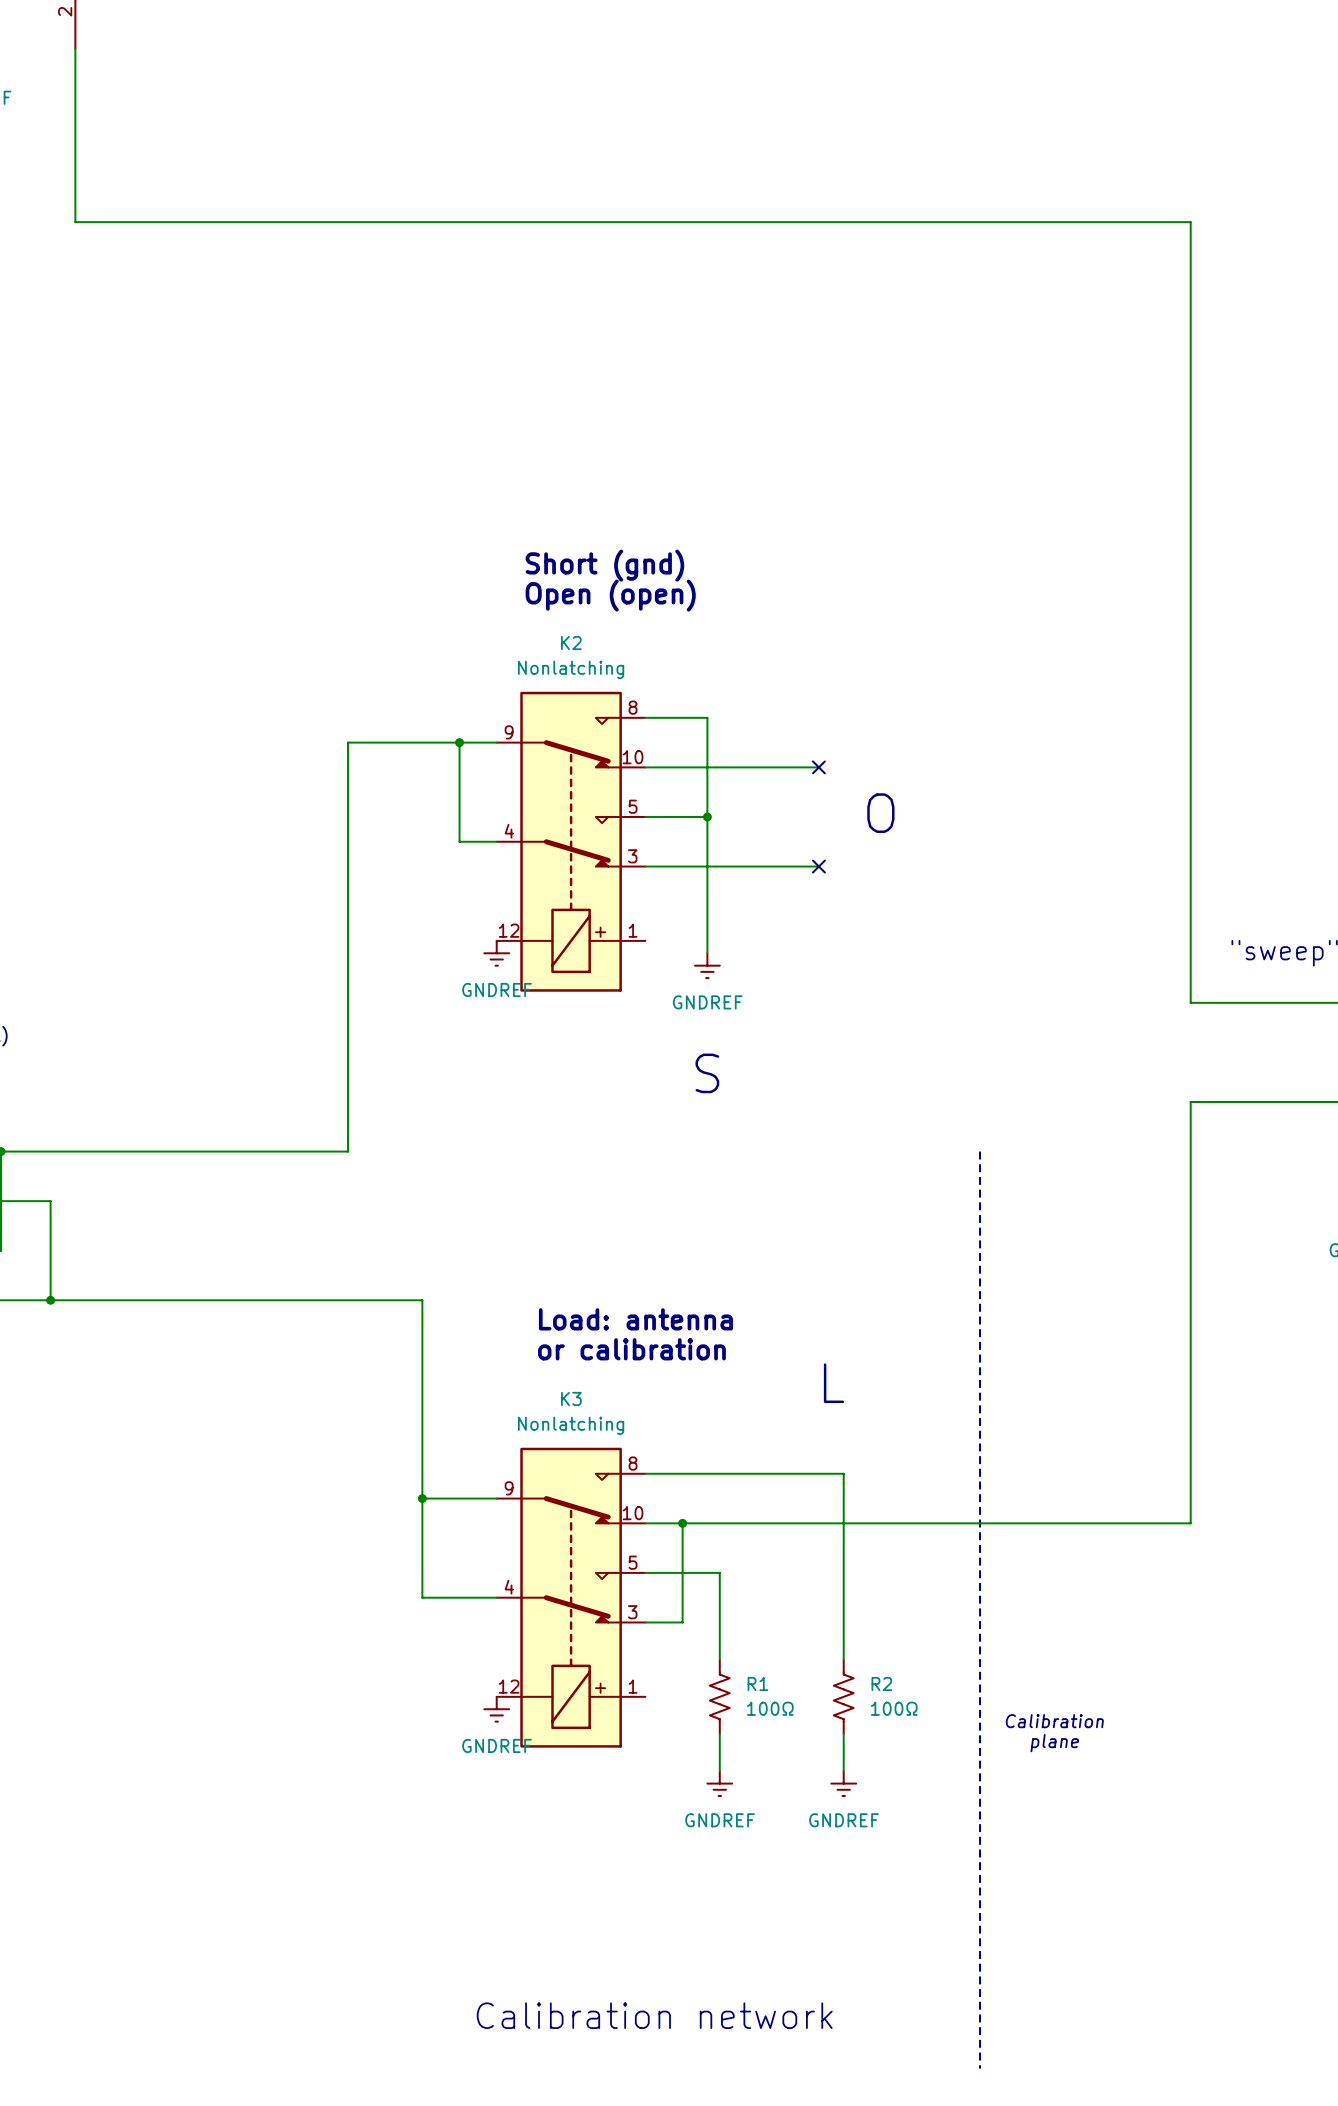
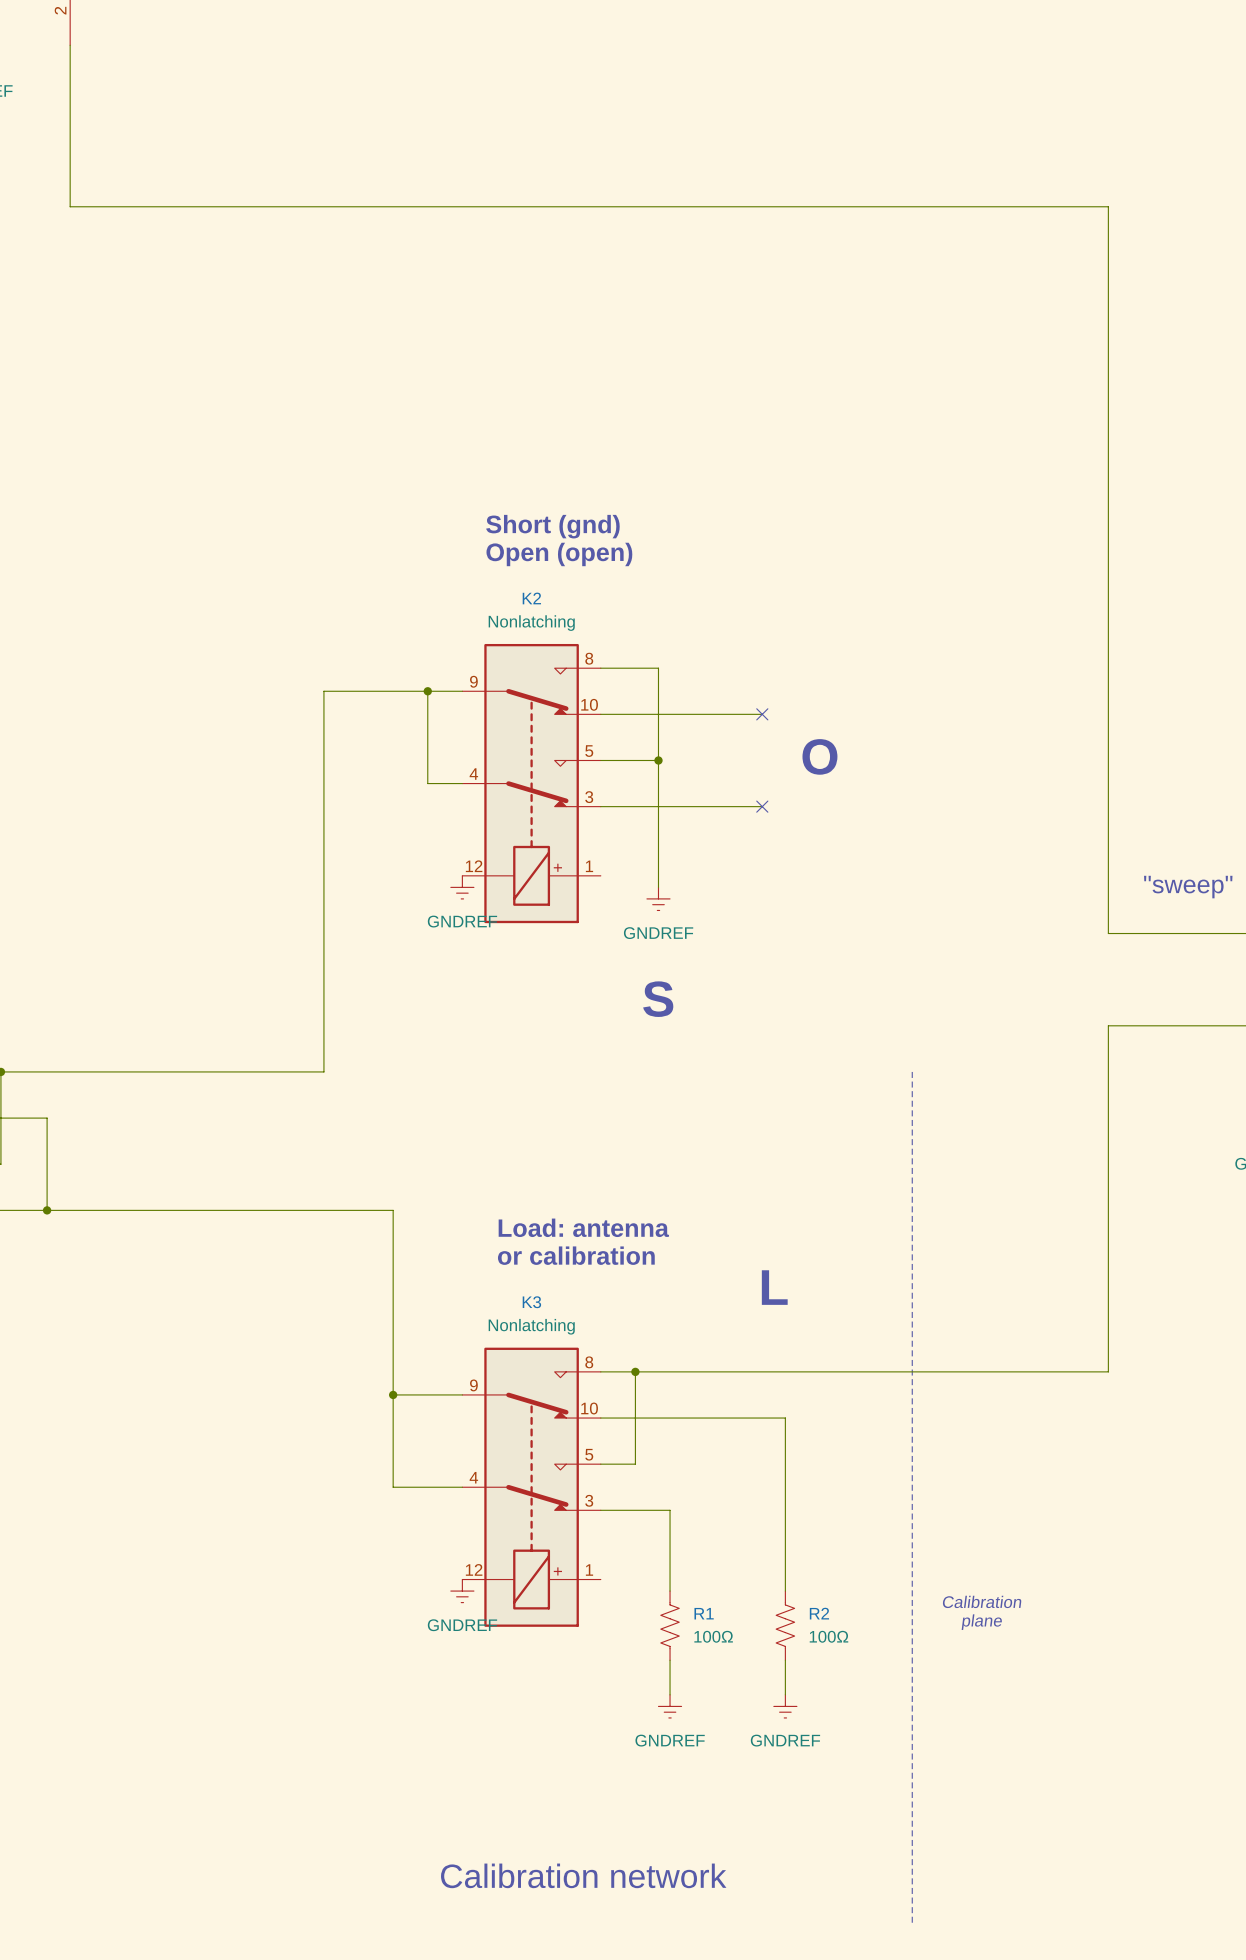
wire: none -> (635, 1371) (635, 1418)
wire: (843, 1473) (843, 1523) (1190, 1523) (1190, 1473) -> (785, 1371) (1108, 1371)
junction position: (682, 1523) -> (635, 1371)
wire: (682, 1622) (682, 1572) (719, 1572) (719, 1622) -> (635, 1510) (670, 1510)
wire: none -> (670, 1544) (670, 1591)
wire: none -> (785, 1544) (785, 1591)
R1 position: (719, 1696) -> (670, 1625)
R2 position: (843, 1696) -> (785, 1625)
wire: (719, 1734) (719, 1771) -> (670, 1660) (670, 1694)
wire: (843, 1734) (843, 1771) -> (785, 1660) (785, 1694)
power symbol position: GNDREF (719, 1783) -> GNDREF (670, 1706)
power symbol position: GNDREF (843, 1783) -> GNDREF (785, 1706)

